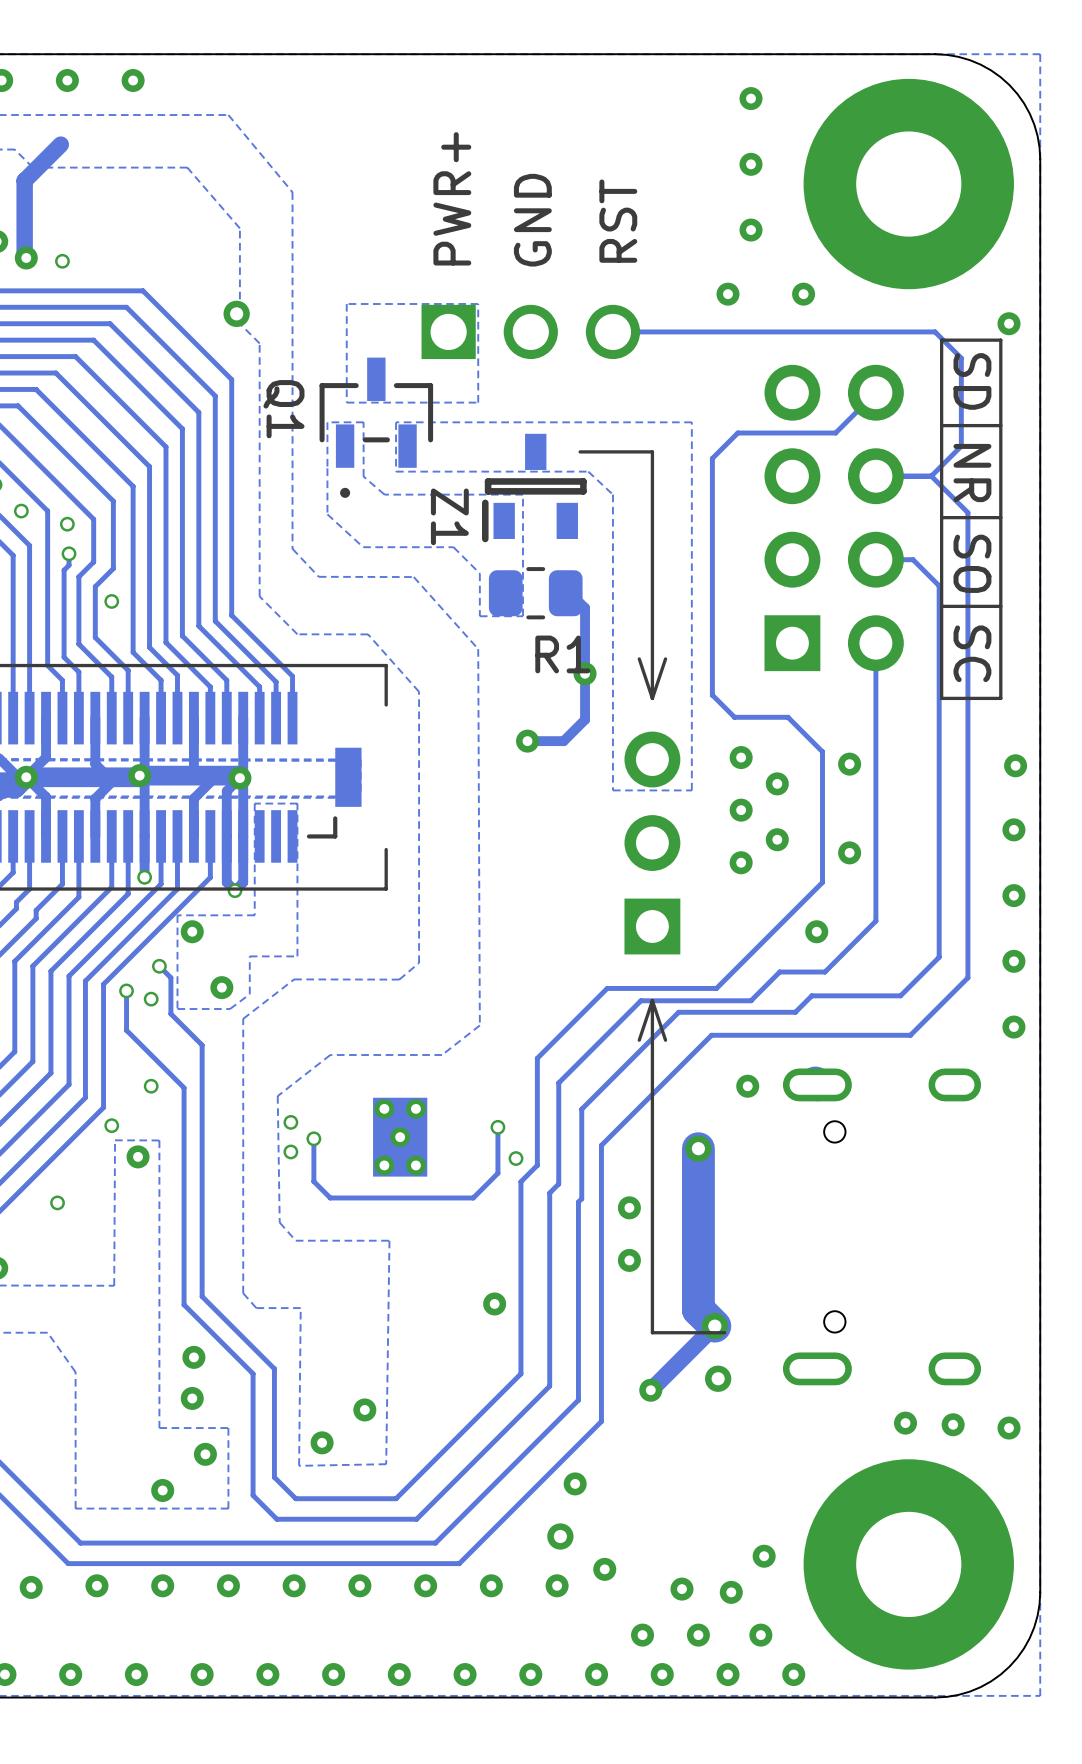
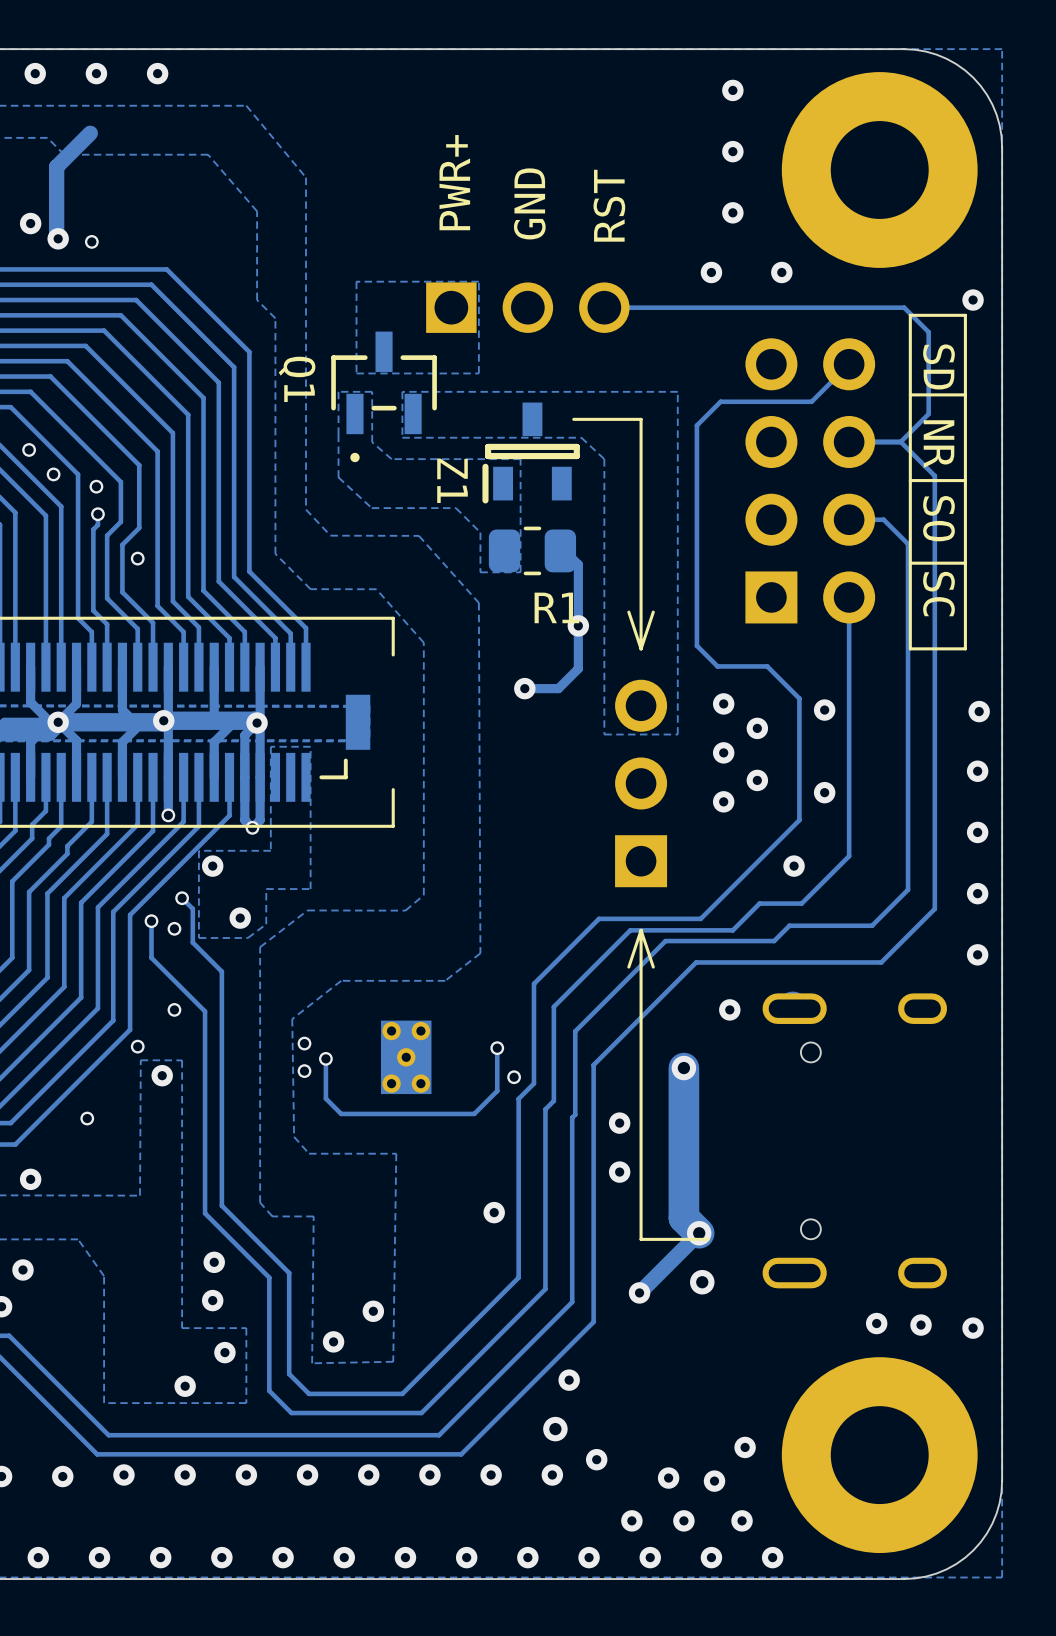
via: (236, 313) -> none

